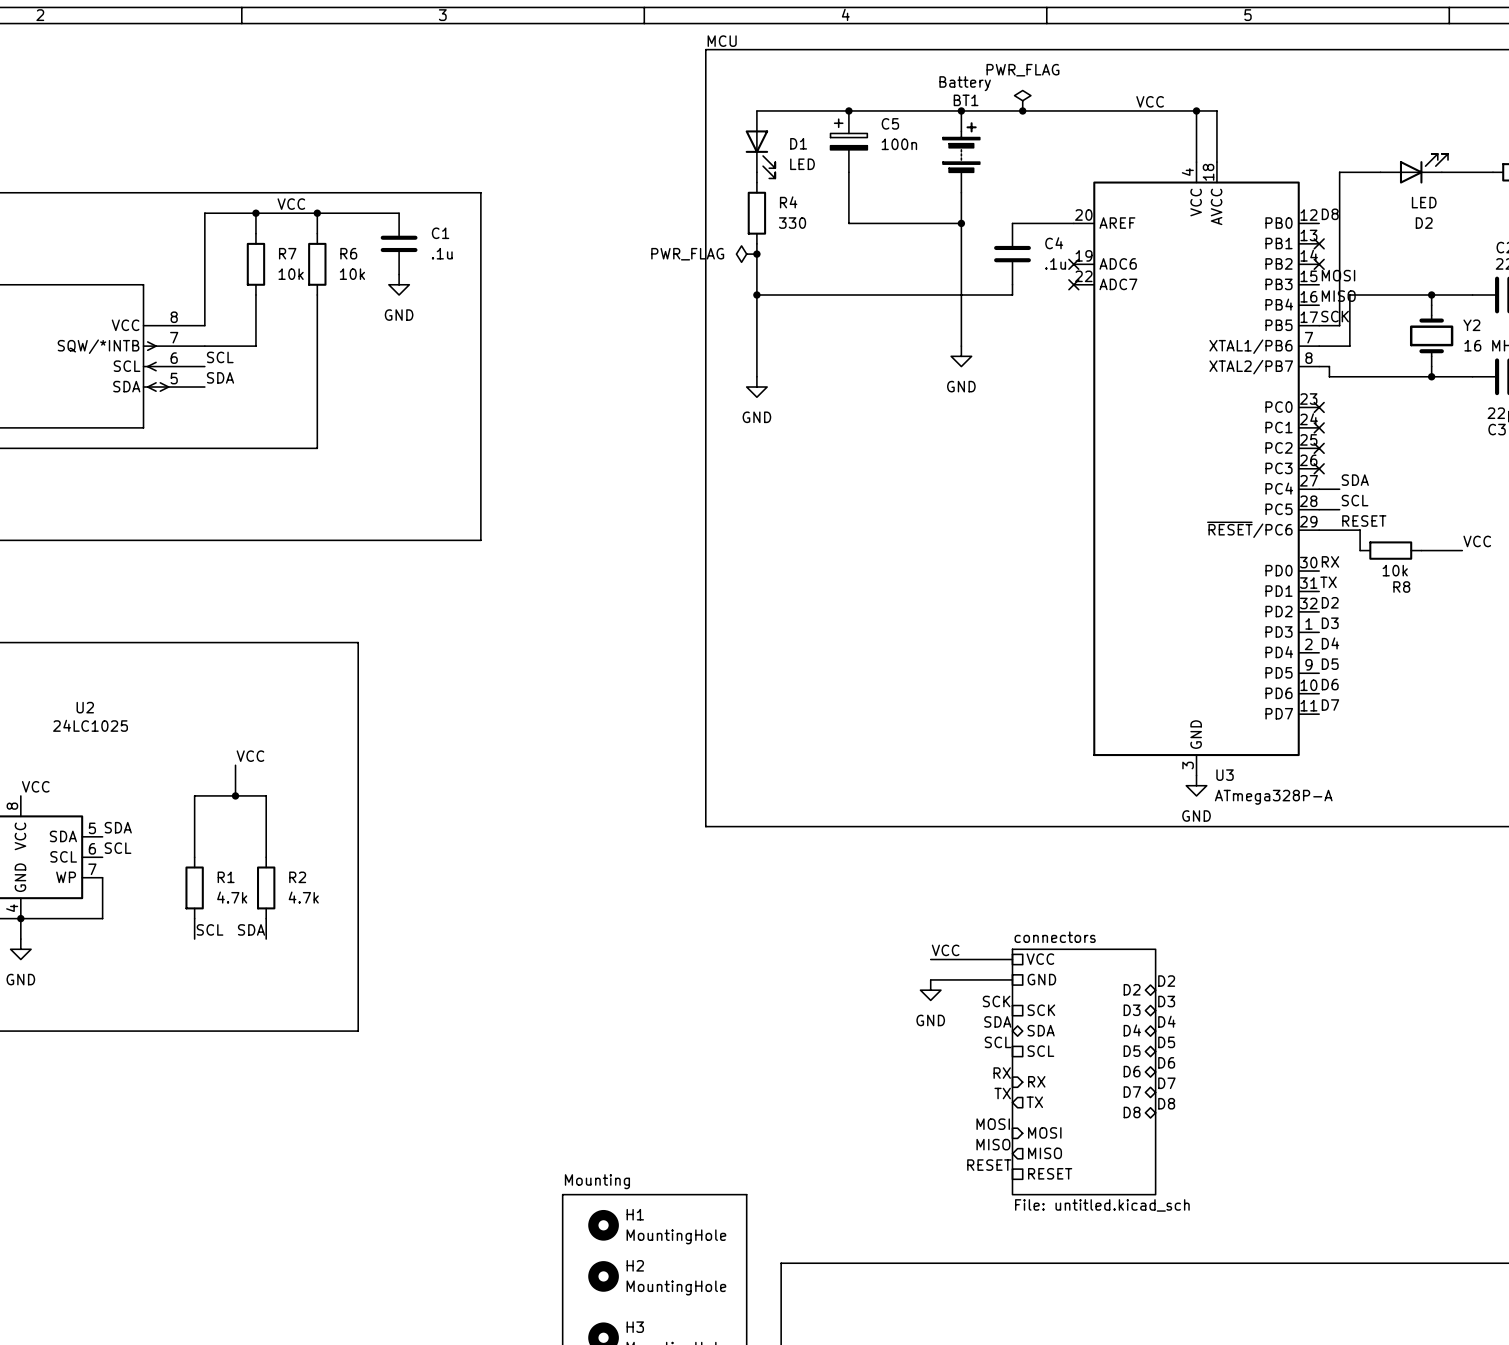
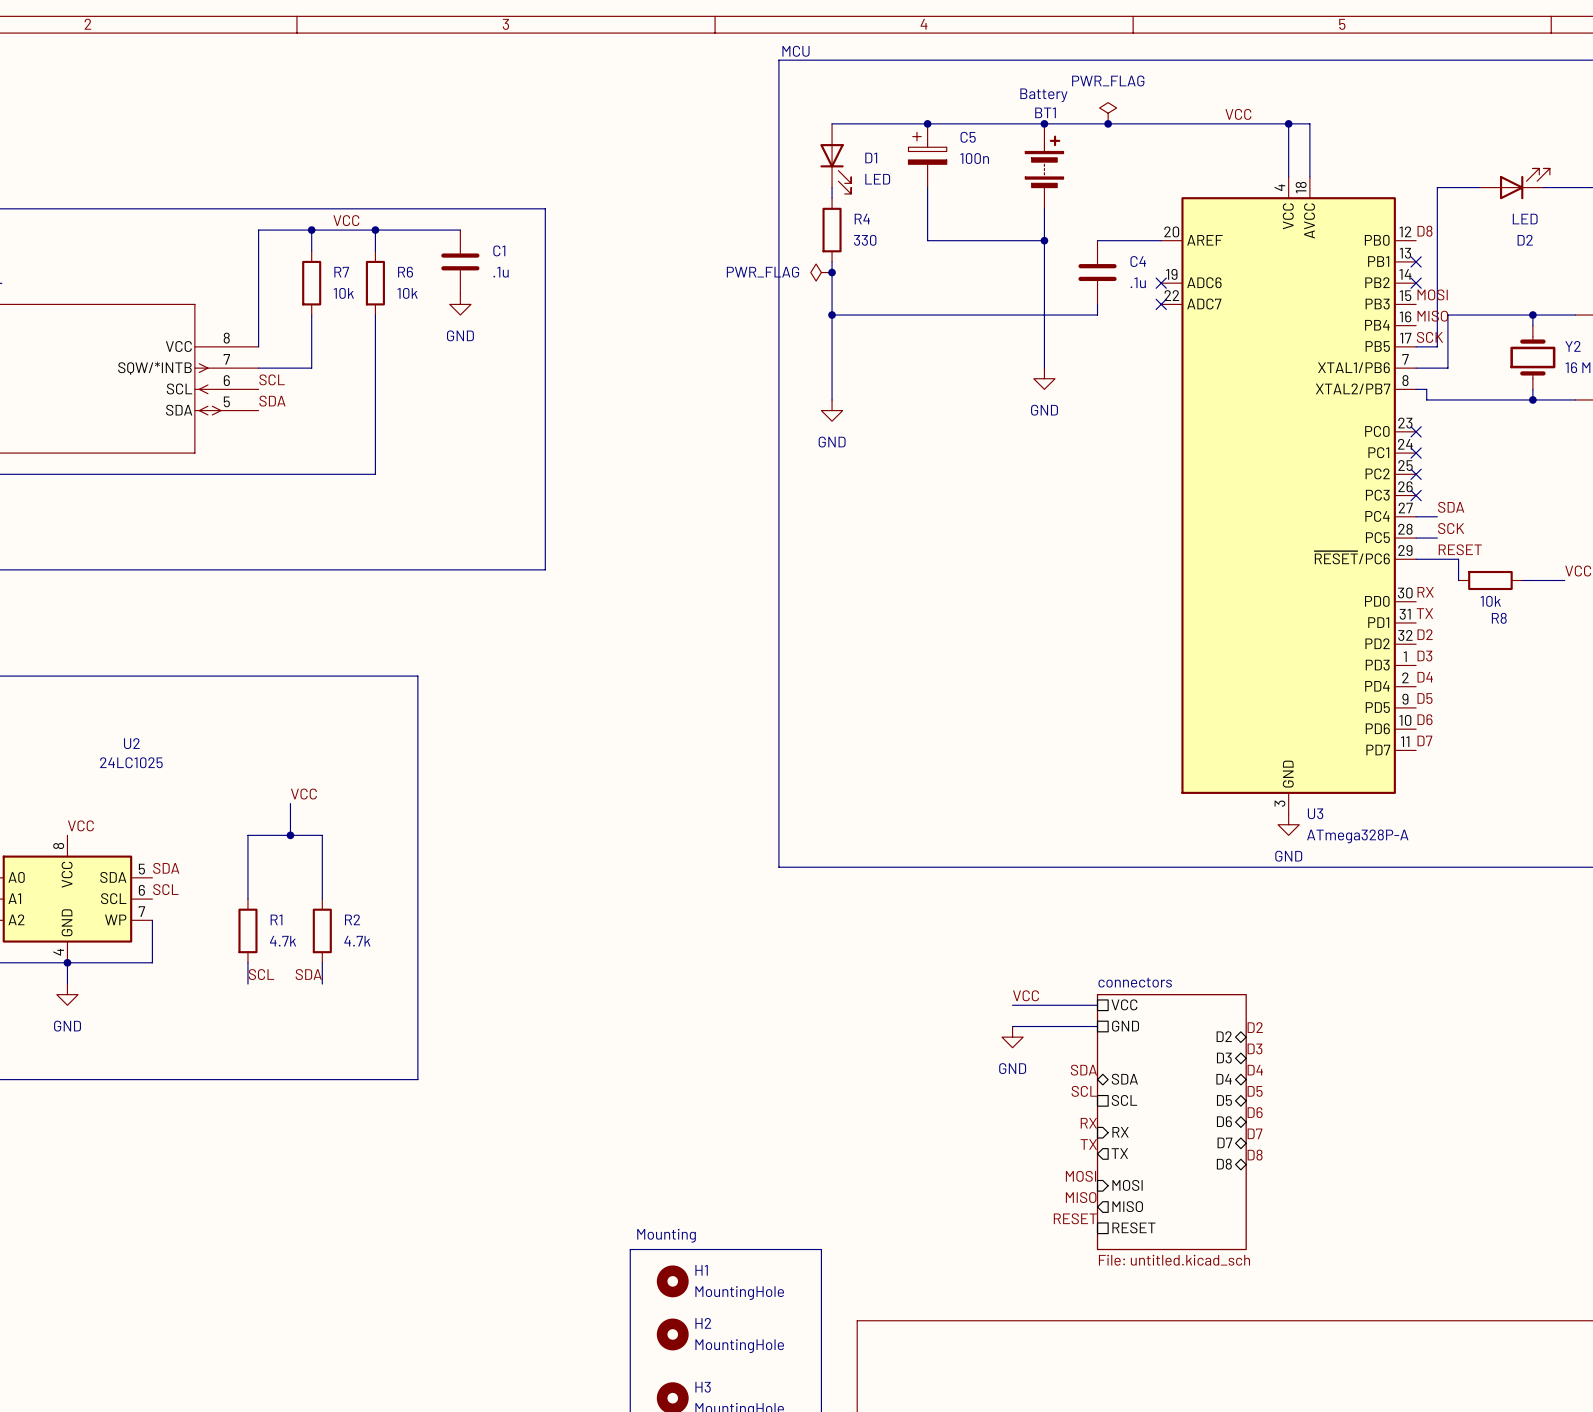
label: SCL (1355, 500) -> SCK (1451, 528)
label: SCK (996, 1001) -> none
sheet pin: SCK (1041, 1010) -> none

